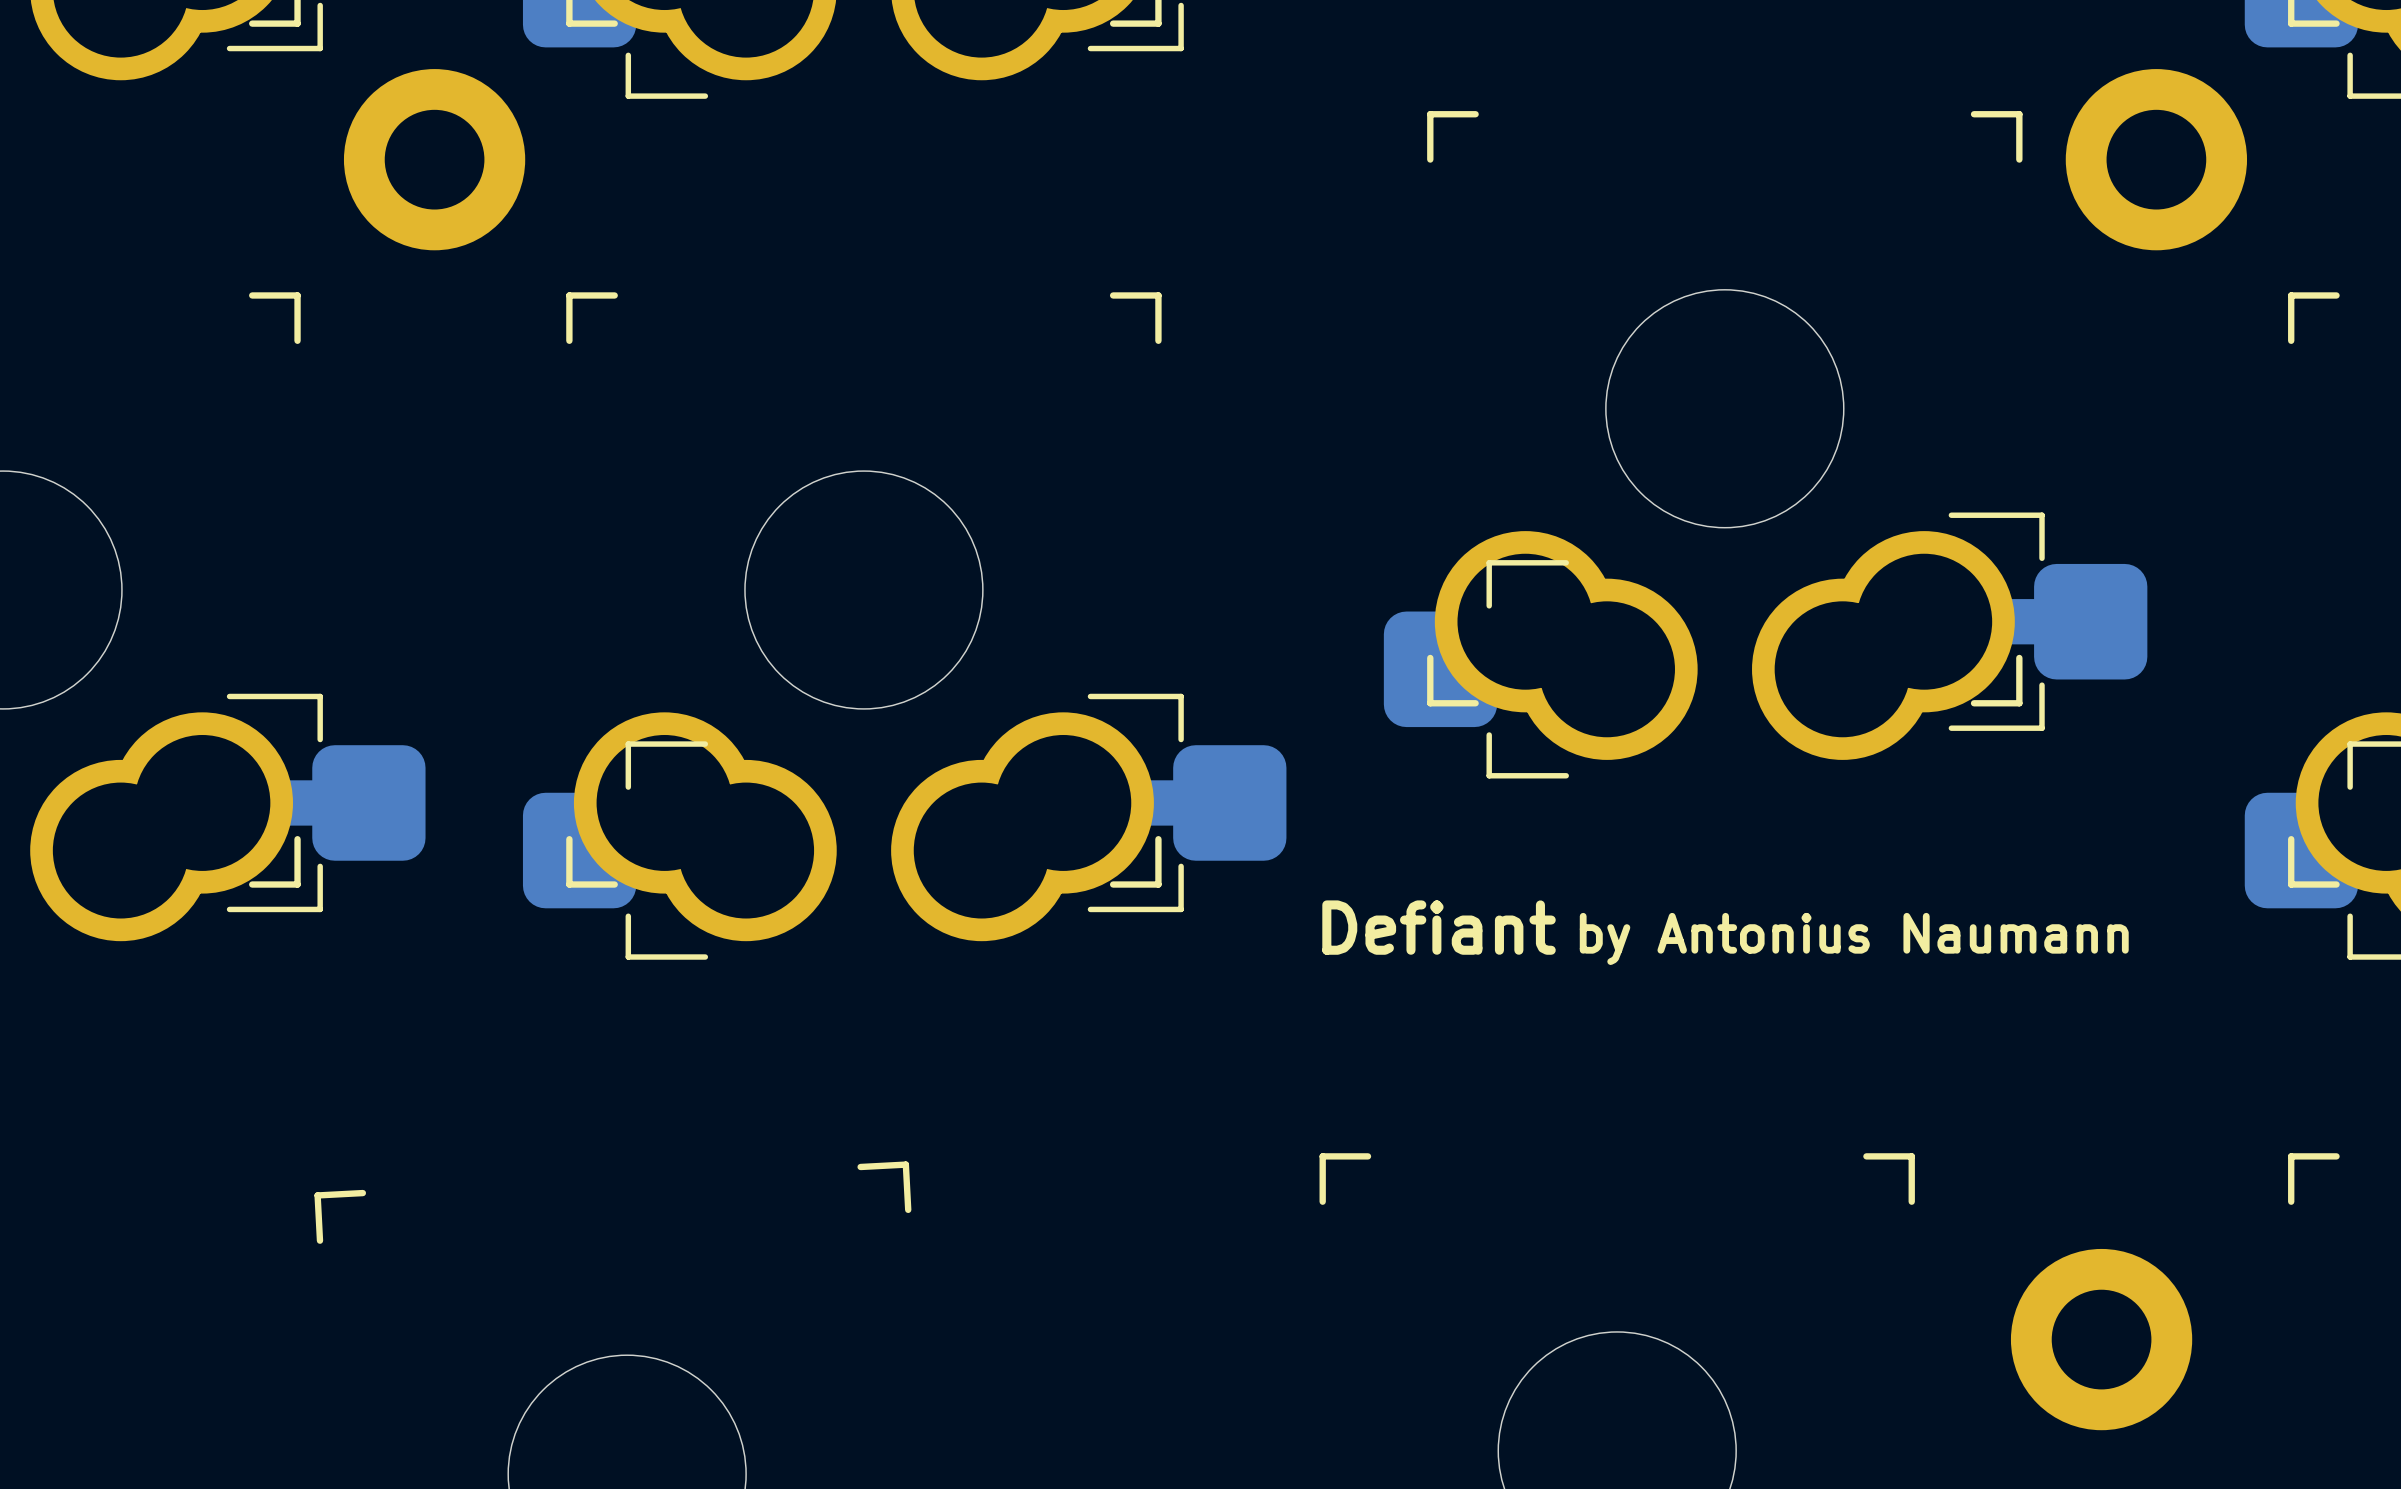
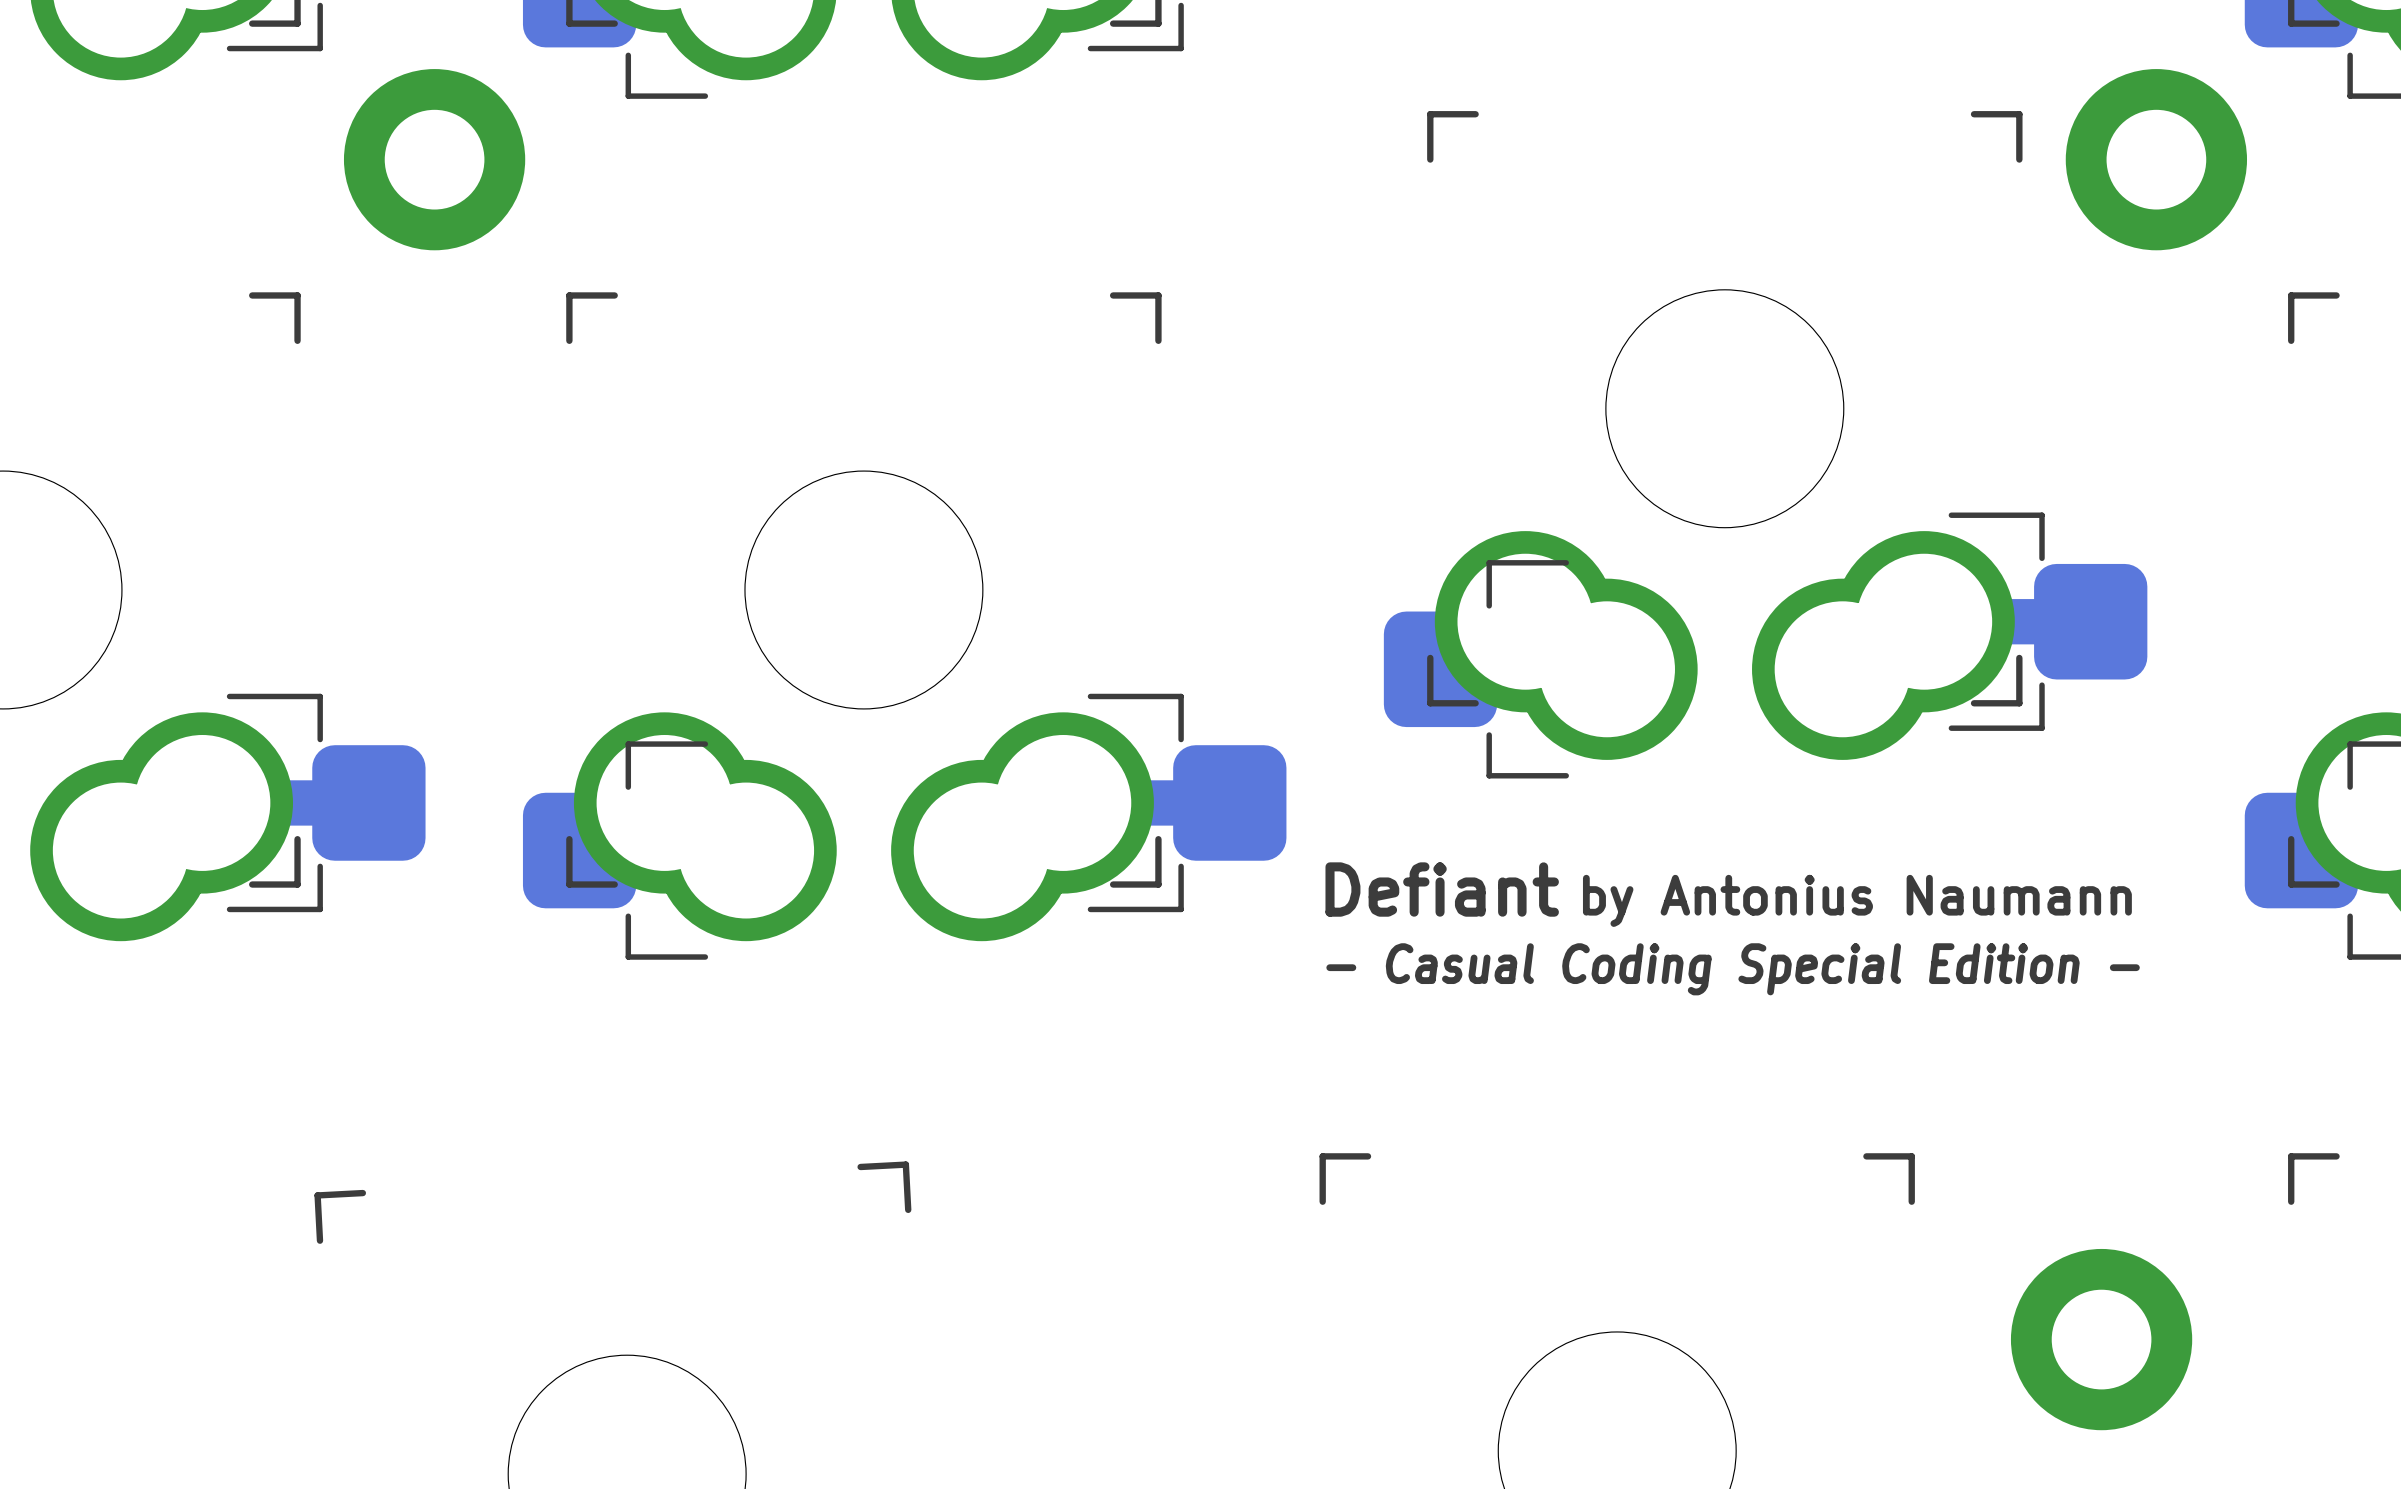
text position: Defiant (1439, 927) -> Defiant (1442, 889)
text position: by Antonius Naumann (1854, 938) -> by Antonius Naumann (1857, 900)
text: none -> - Casual Coding Special Edition - (1733, 969)

